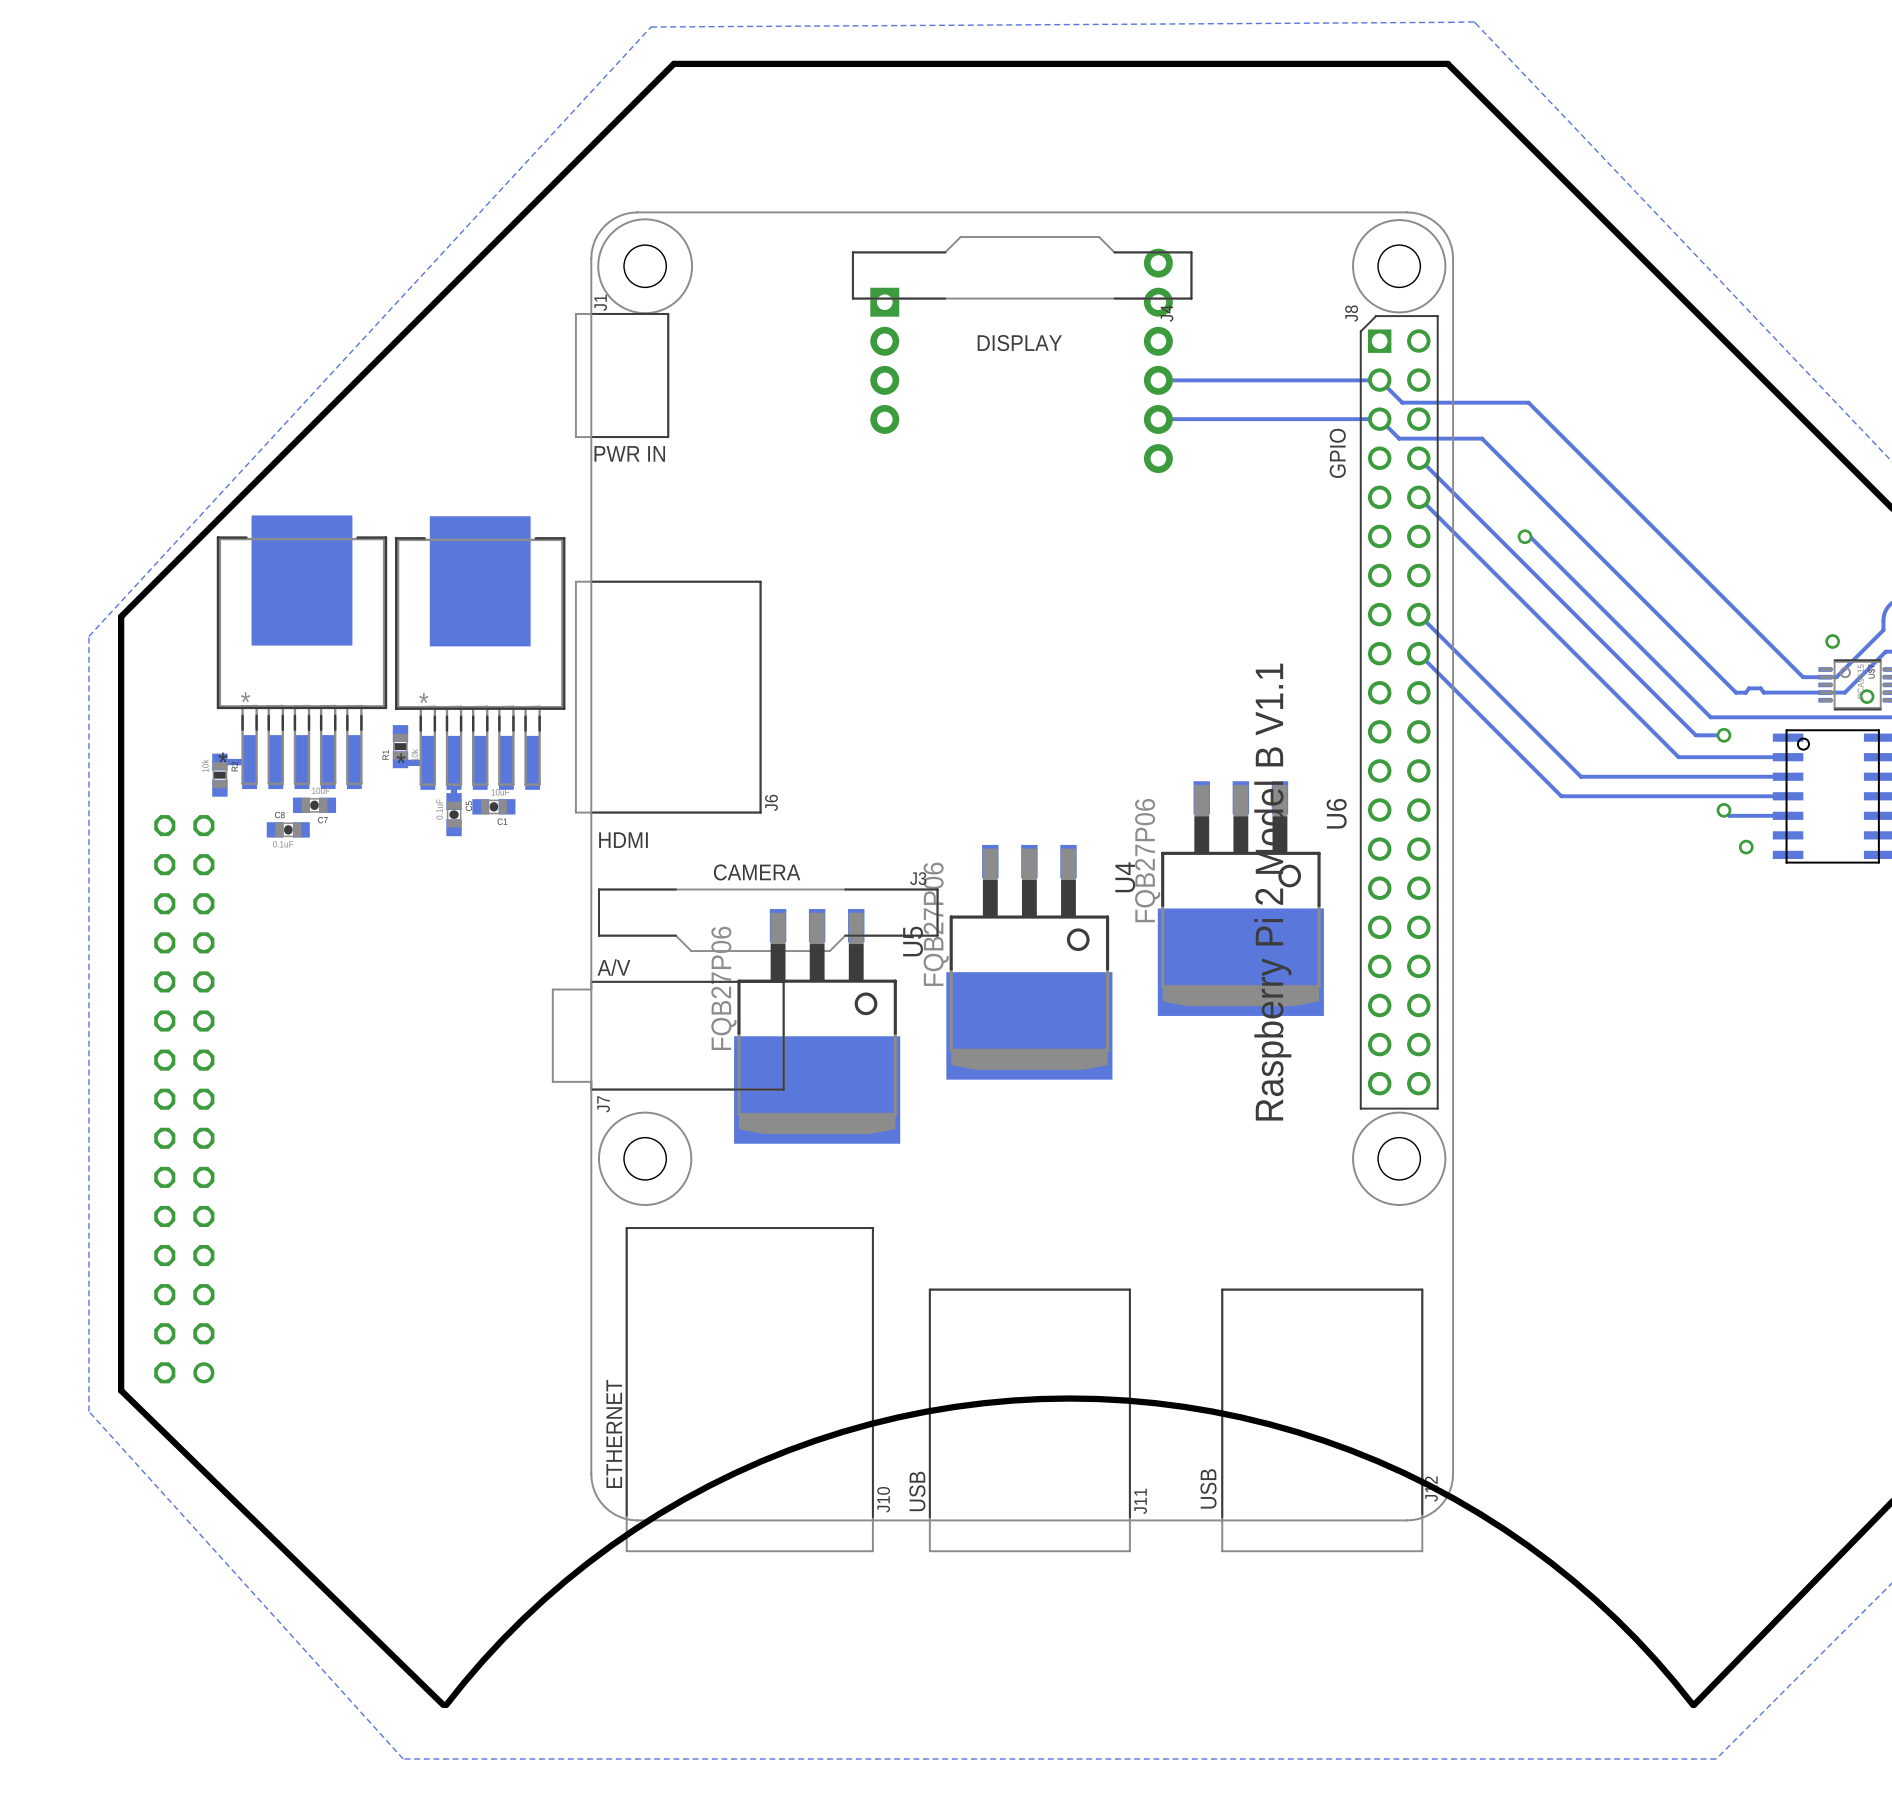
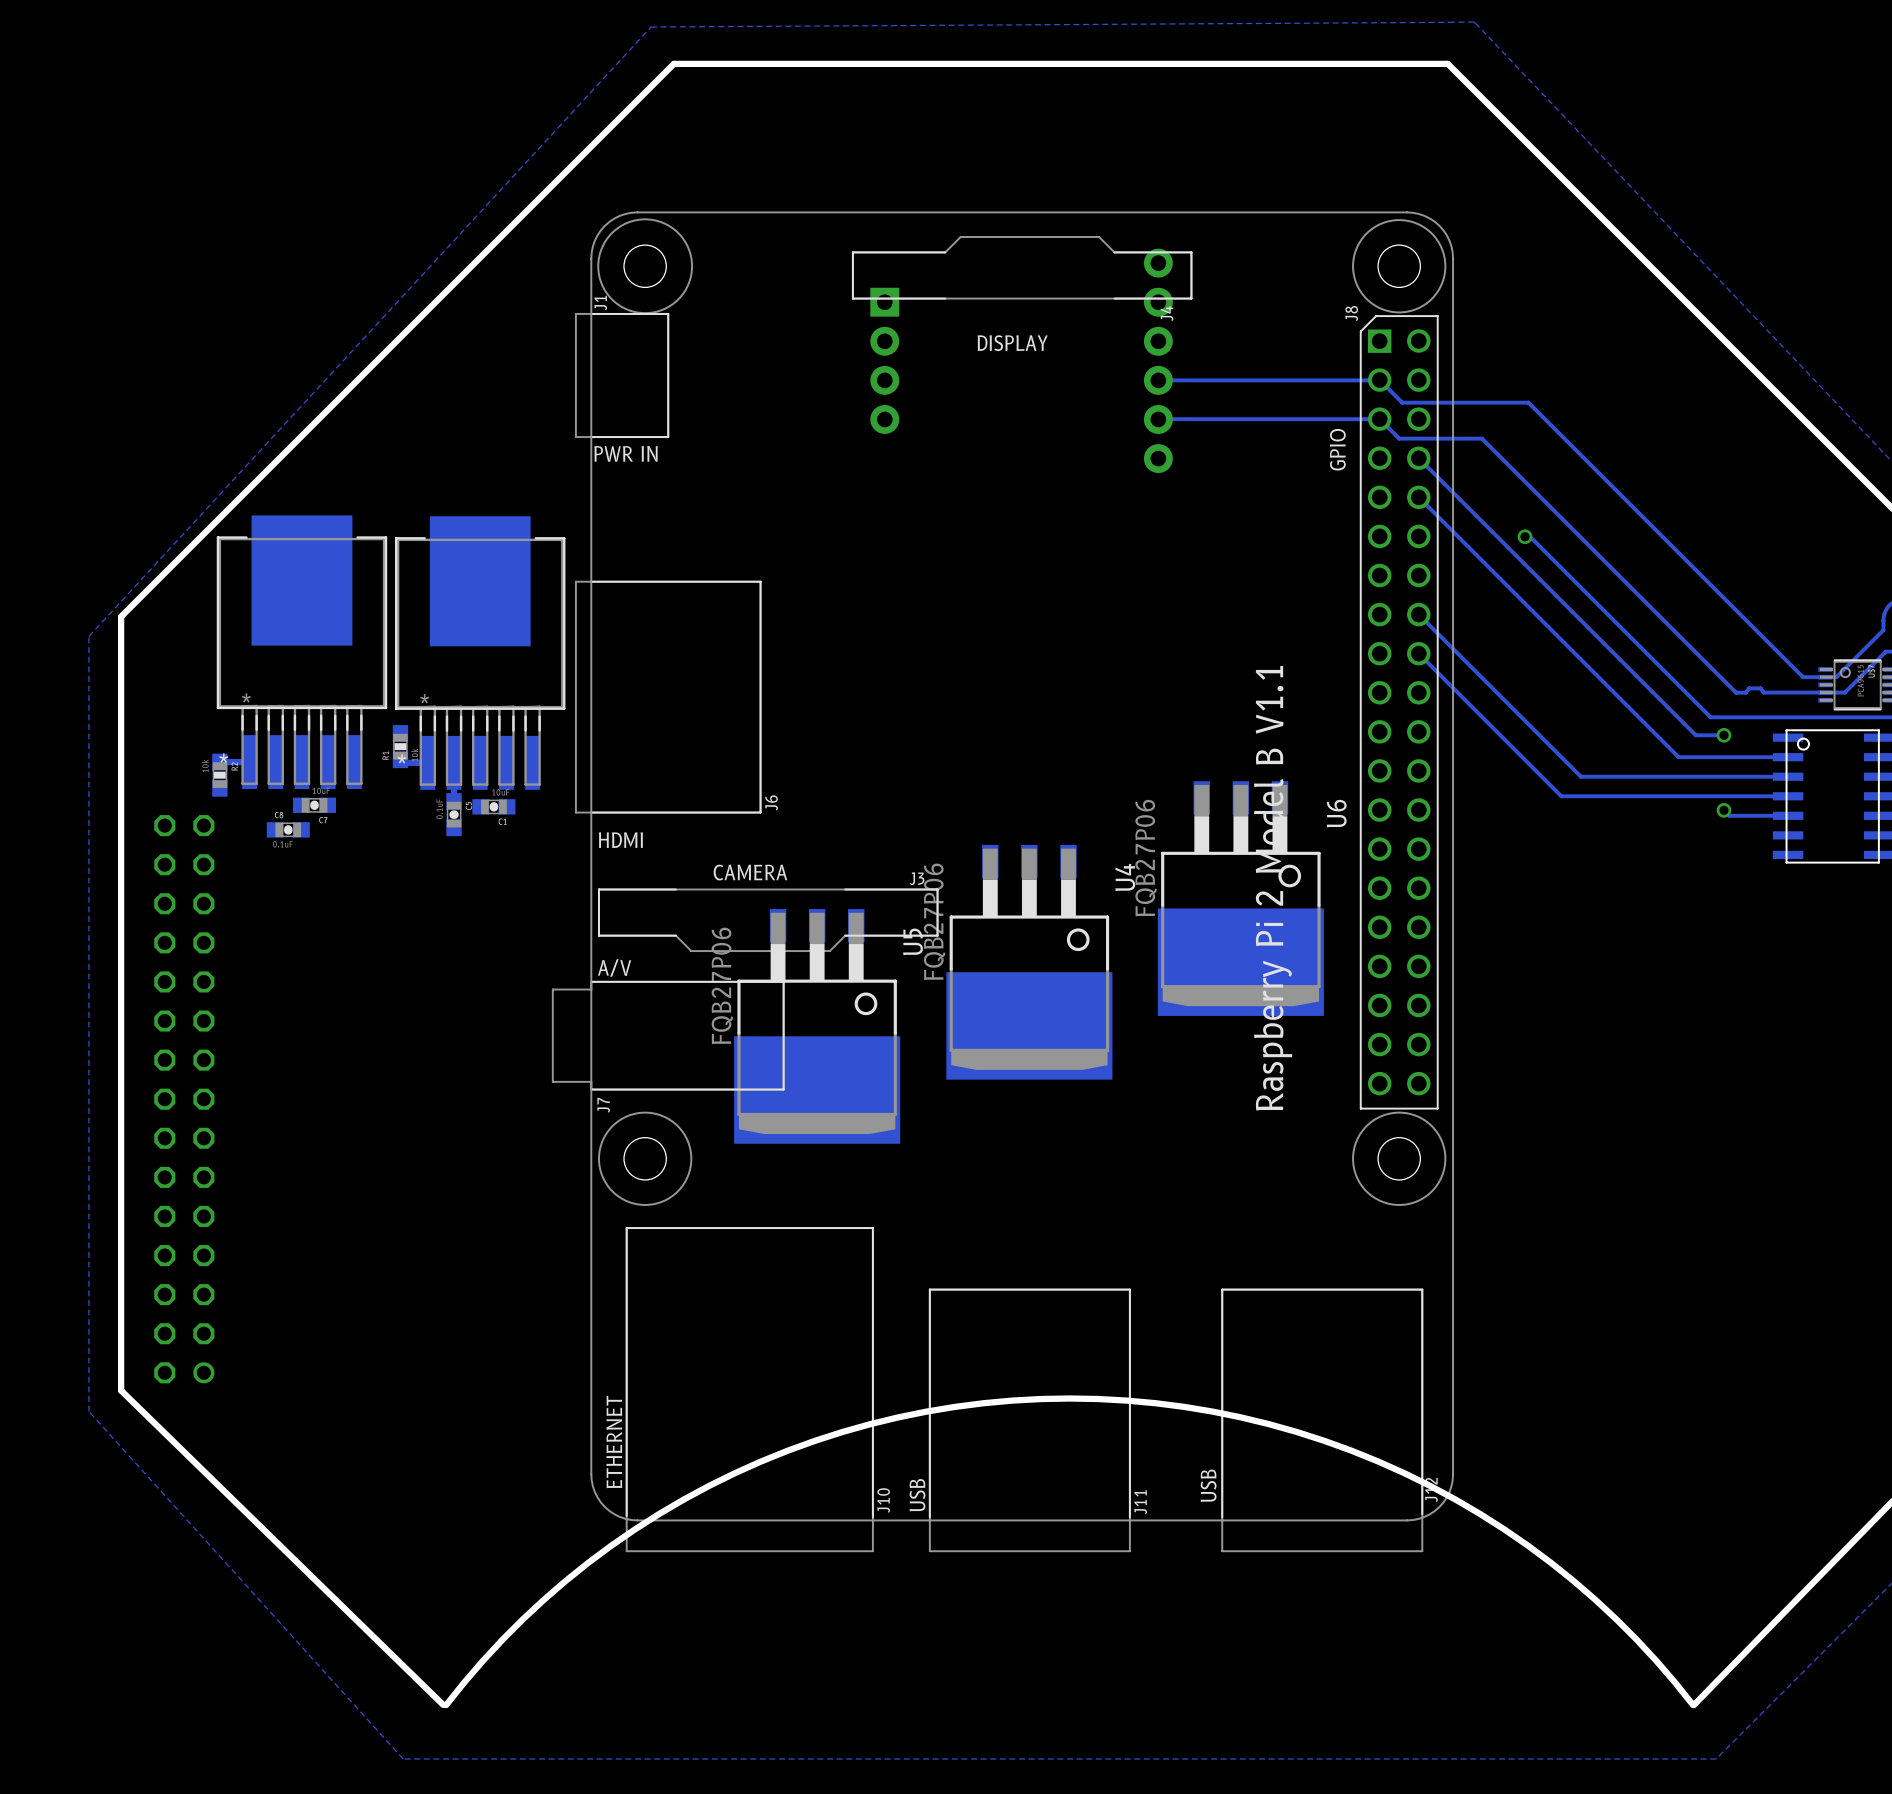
via: (1832, 641) -> none
via: (1867, 696) -> none
via: (1746, 847) -> none

